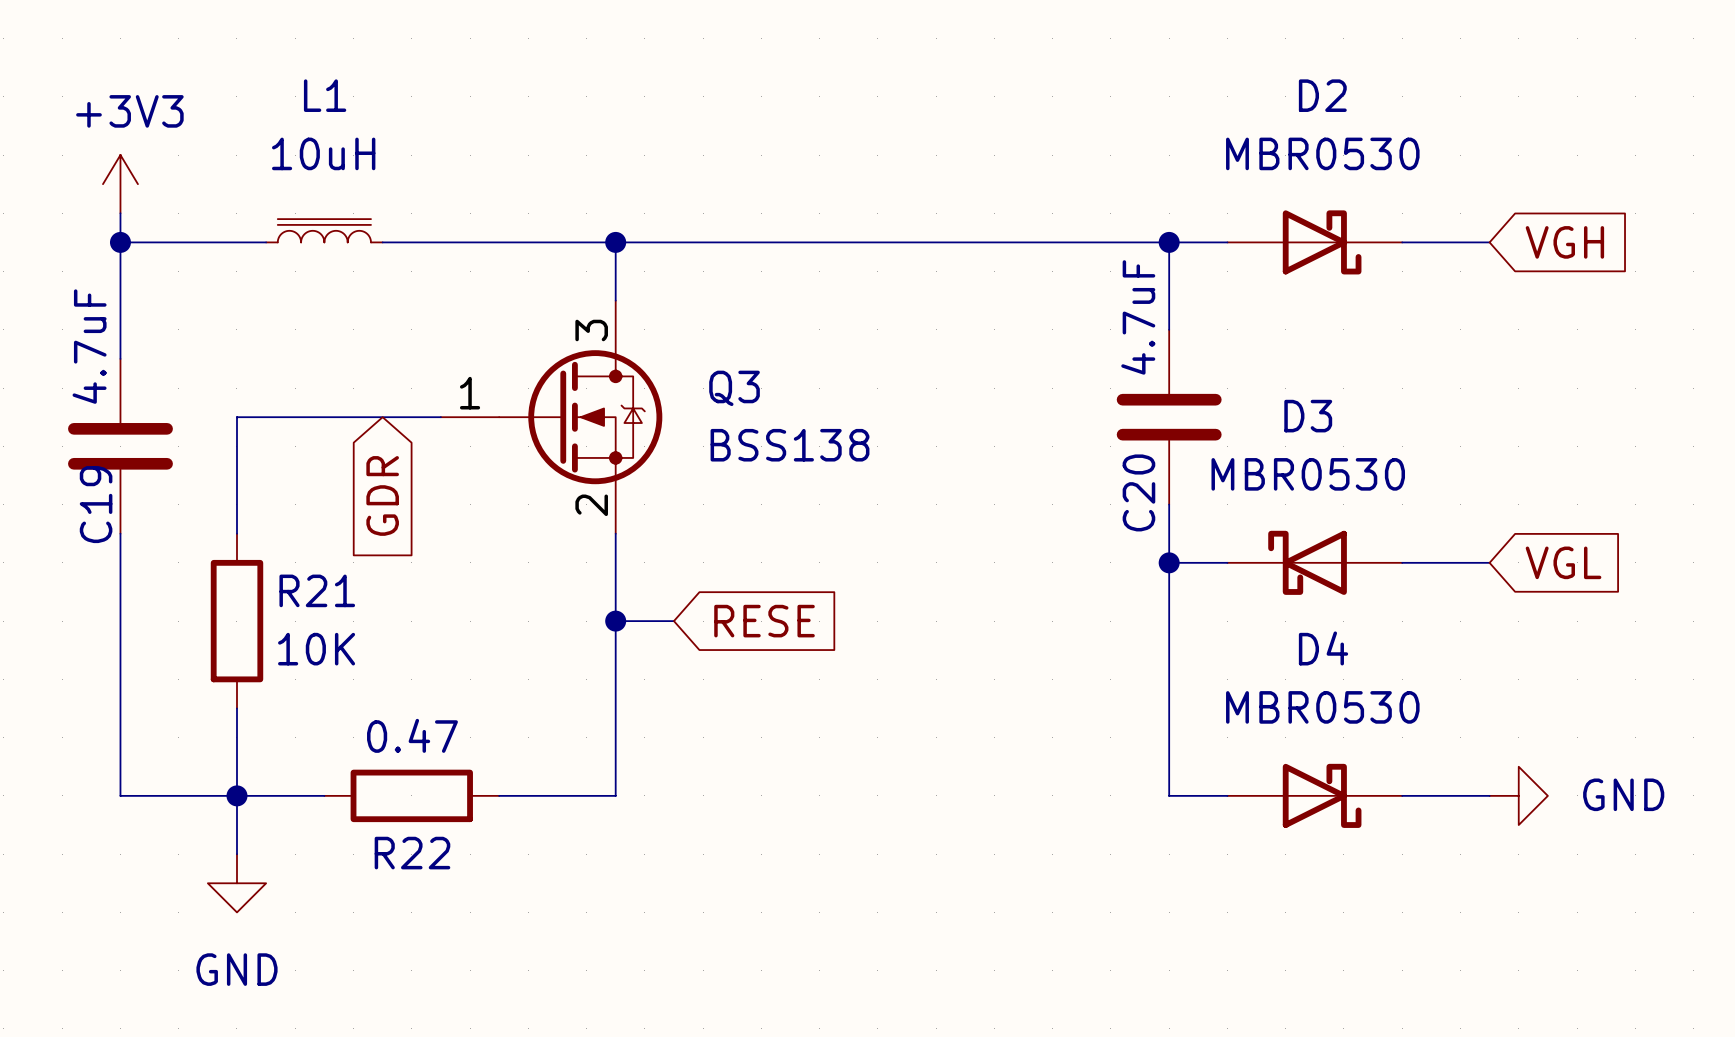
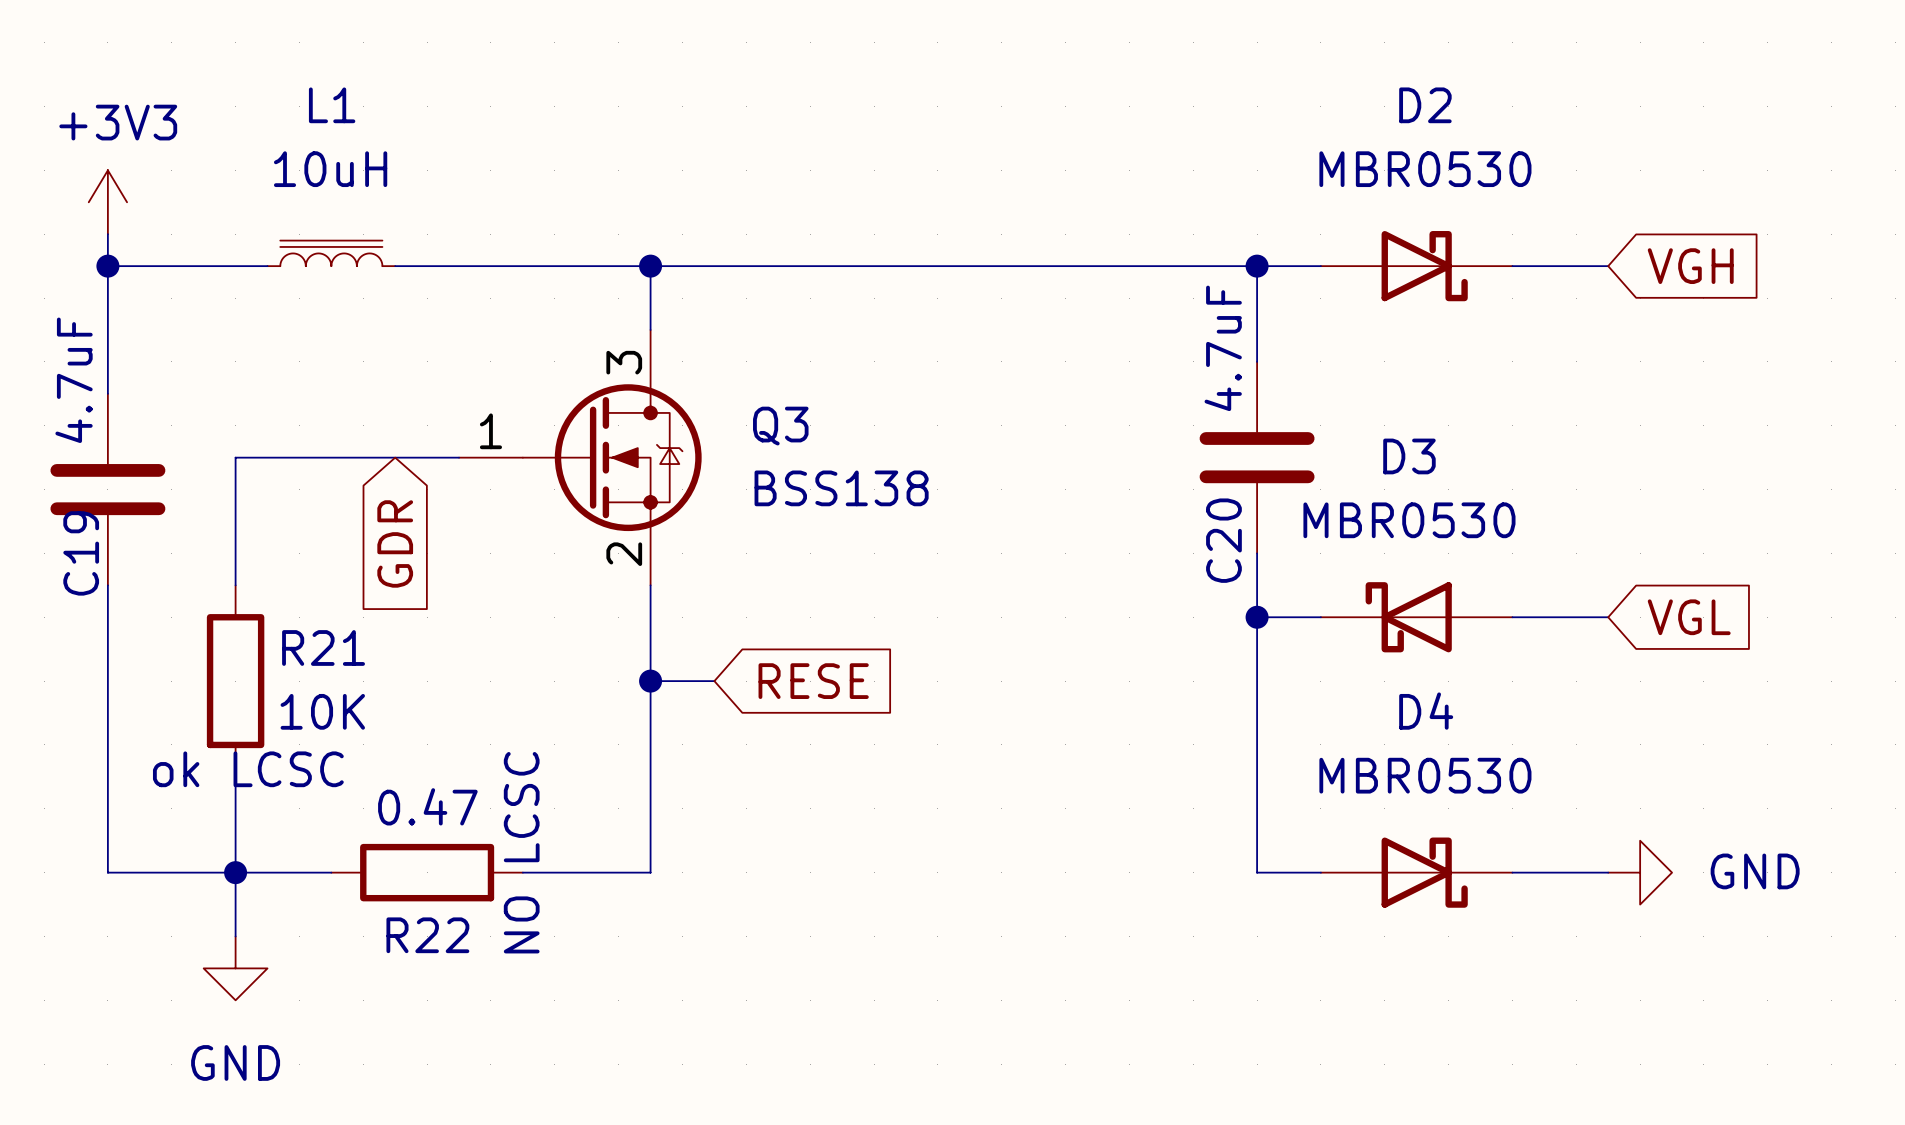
R21 text: none -> ok LCSC (248, 769)
R22 text: none -> NO LCSC (521, 852)

